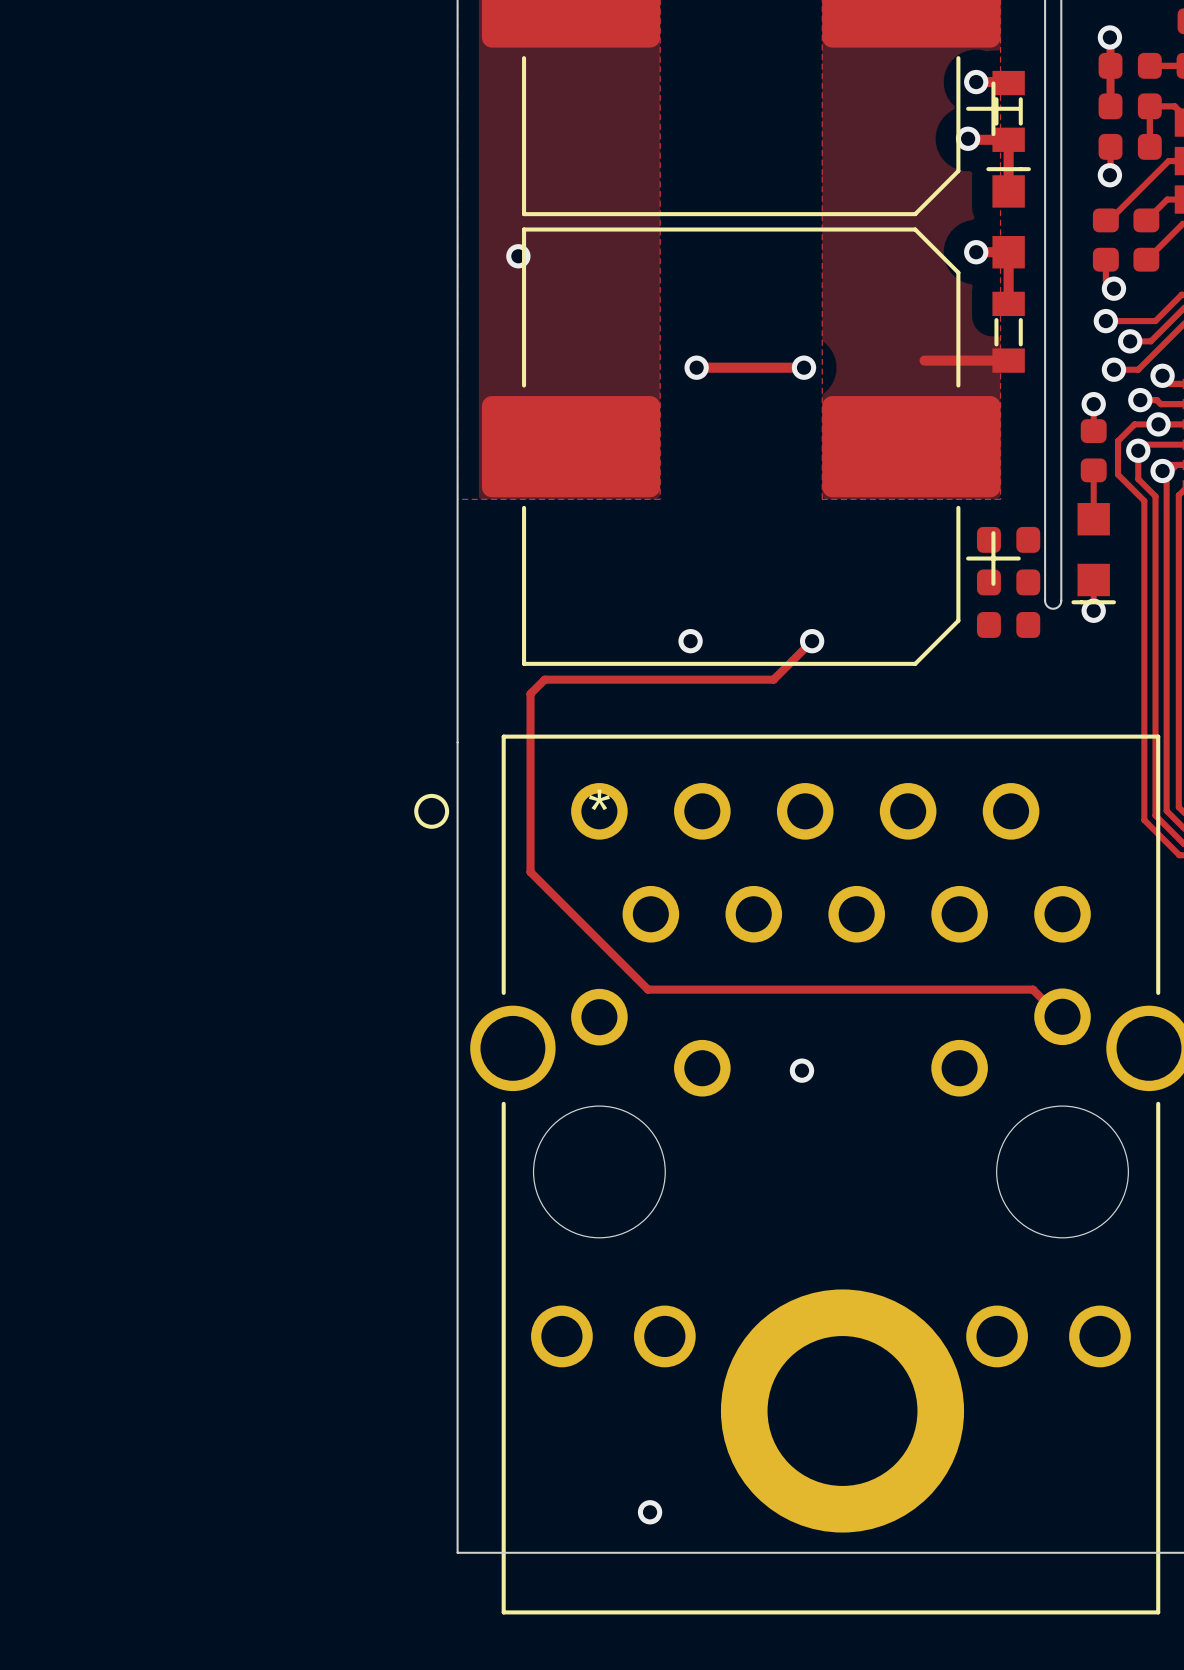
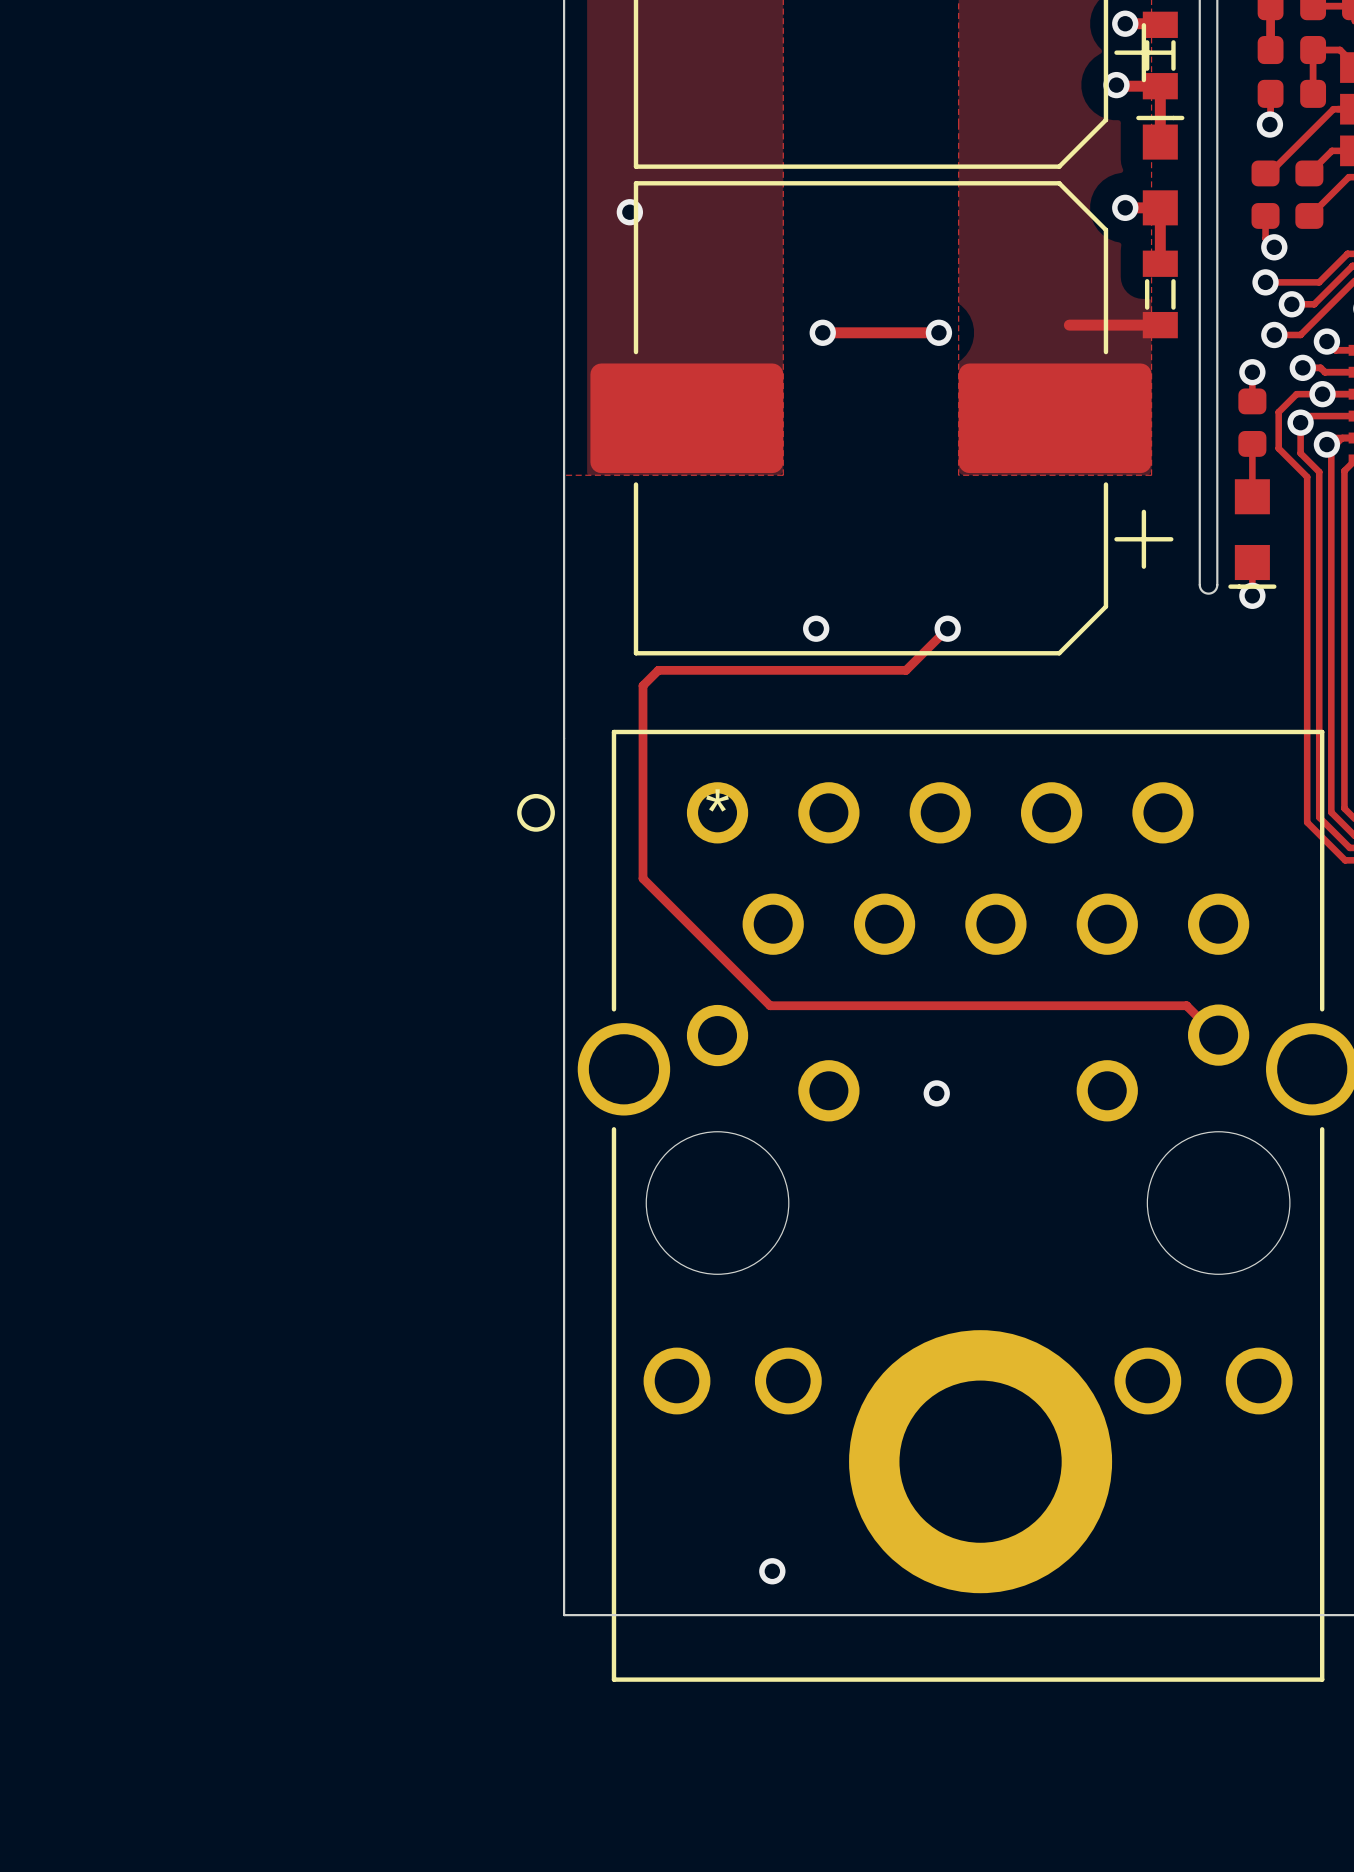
part: (1008, 539) -> none
part: (1008, 582) -> none
part: (1008, 624) -> none

